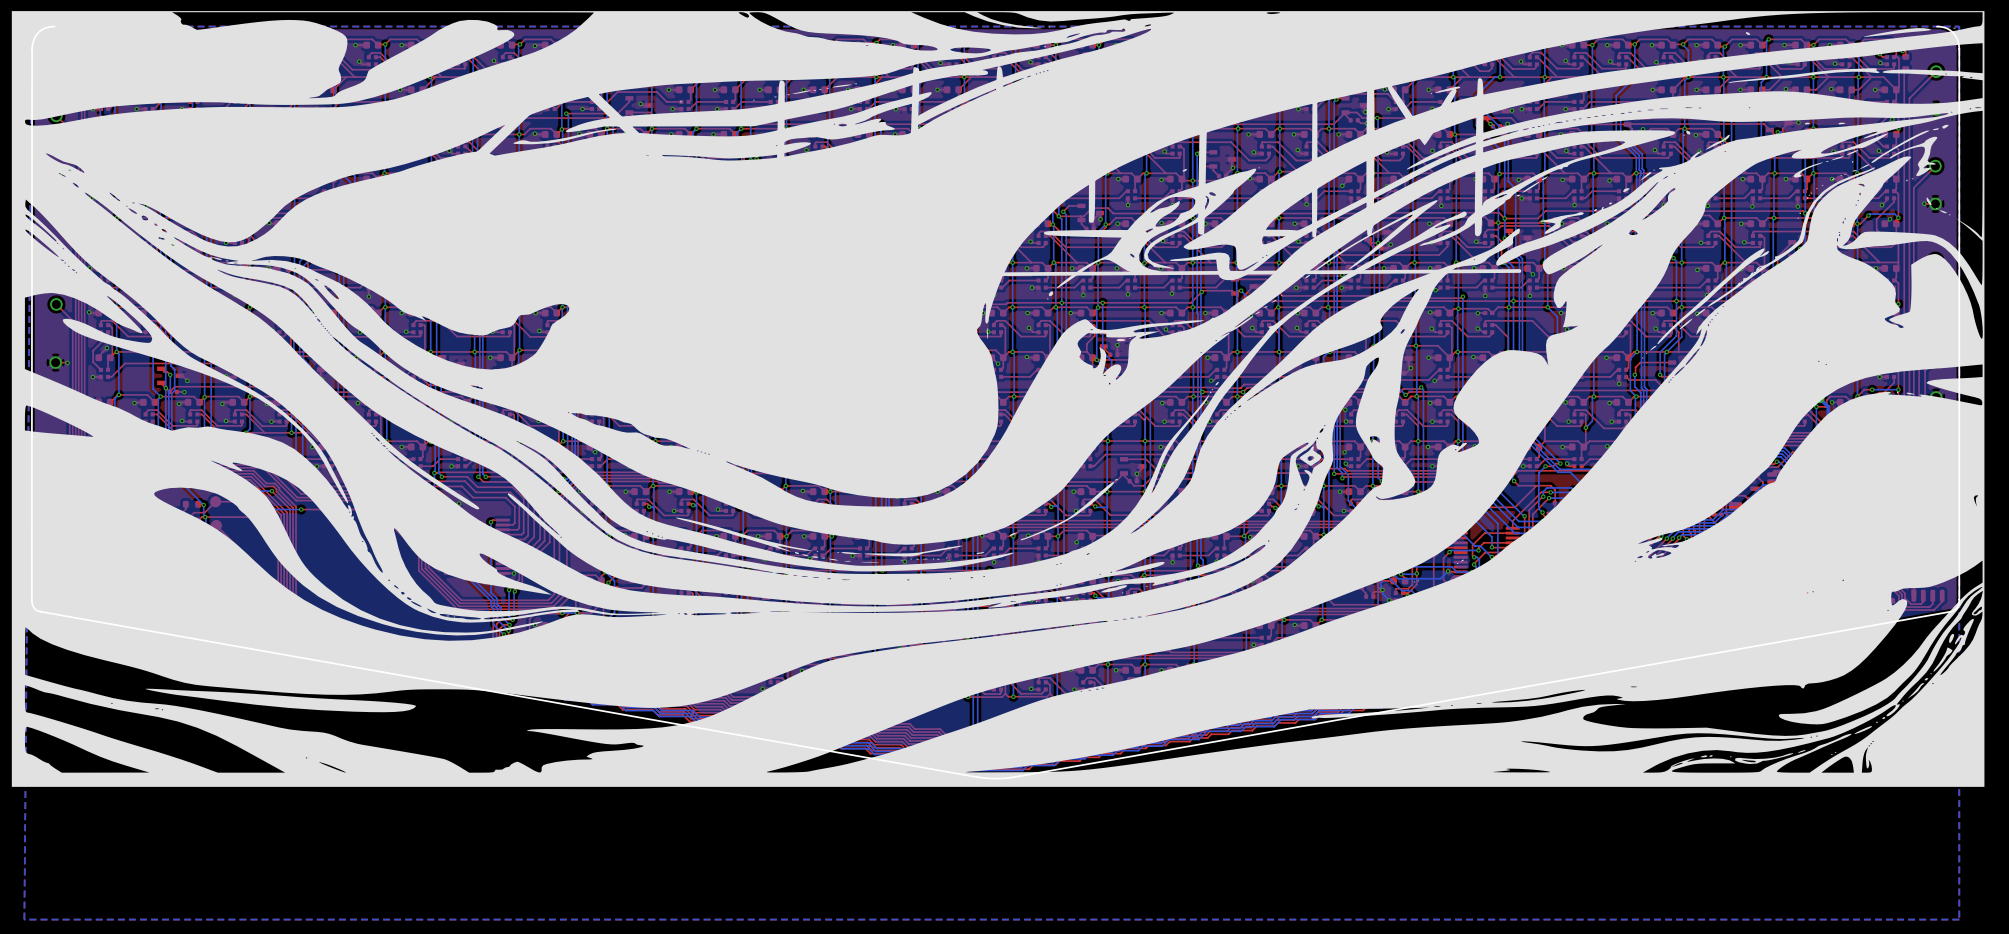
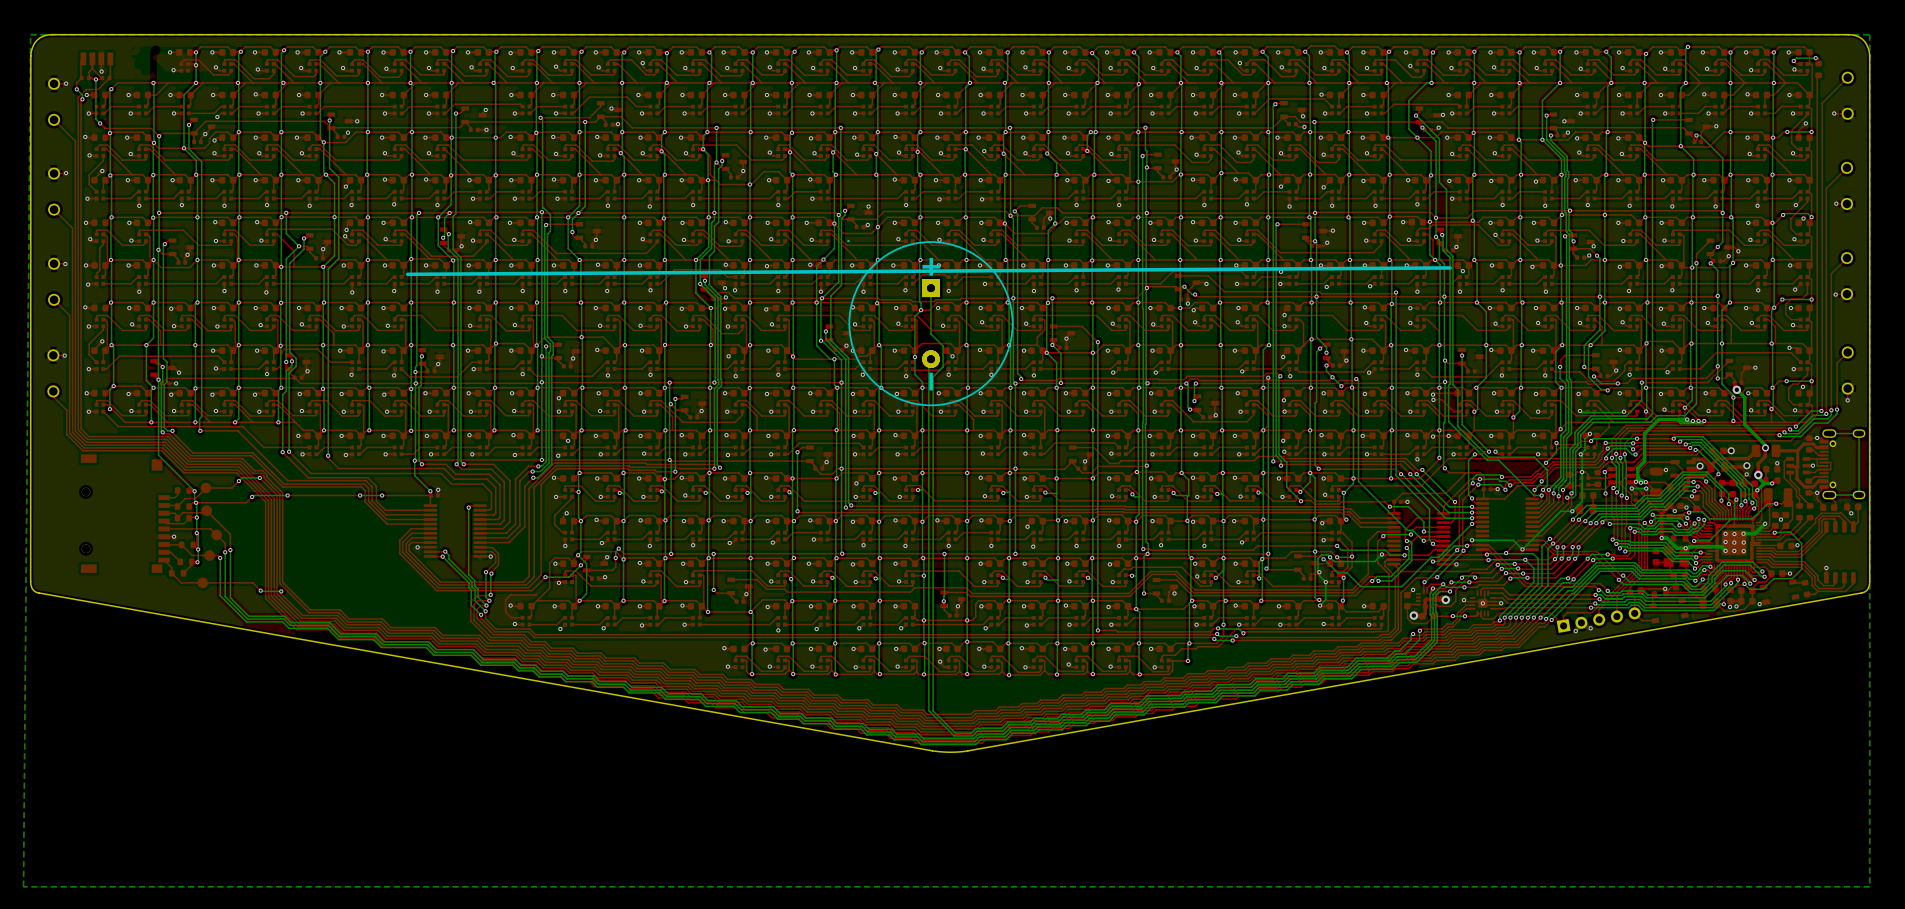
drawing: [11, 11, 1985, 787] -> none
board edge: none -> (1848, 34) (52, 34)
part: none -> (930, 323)
top track: (599, 600) (599, 605) (591, 612) (577, 612) -> none
via: (562, 612) -> none
bottom track: (577, 612) (562, 612) -> none
via: (577, 612) -> none

